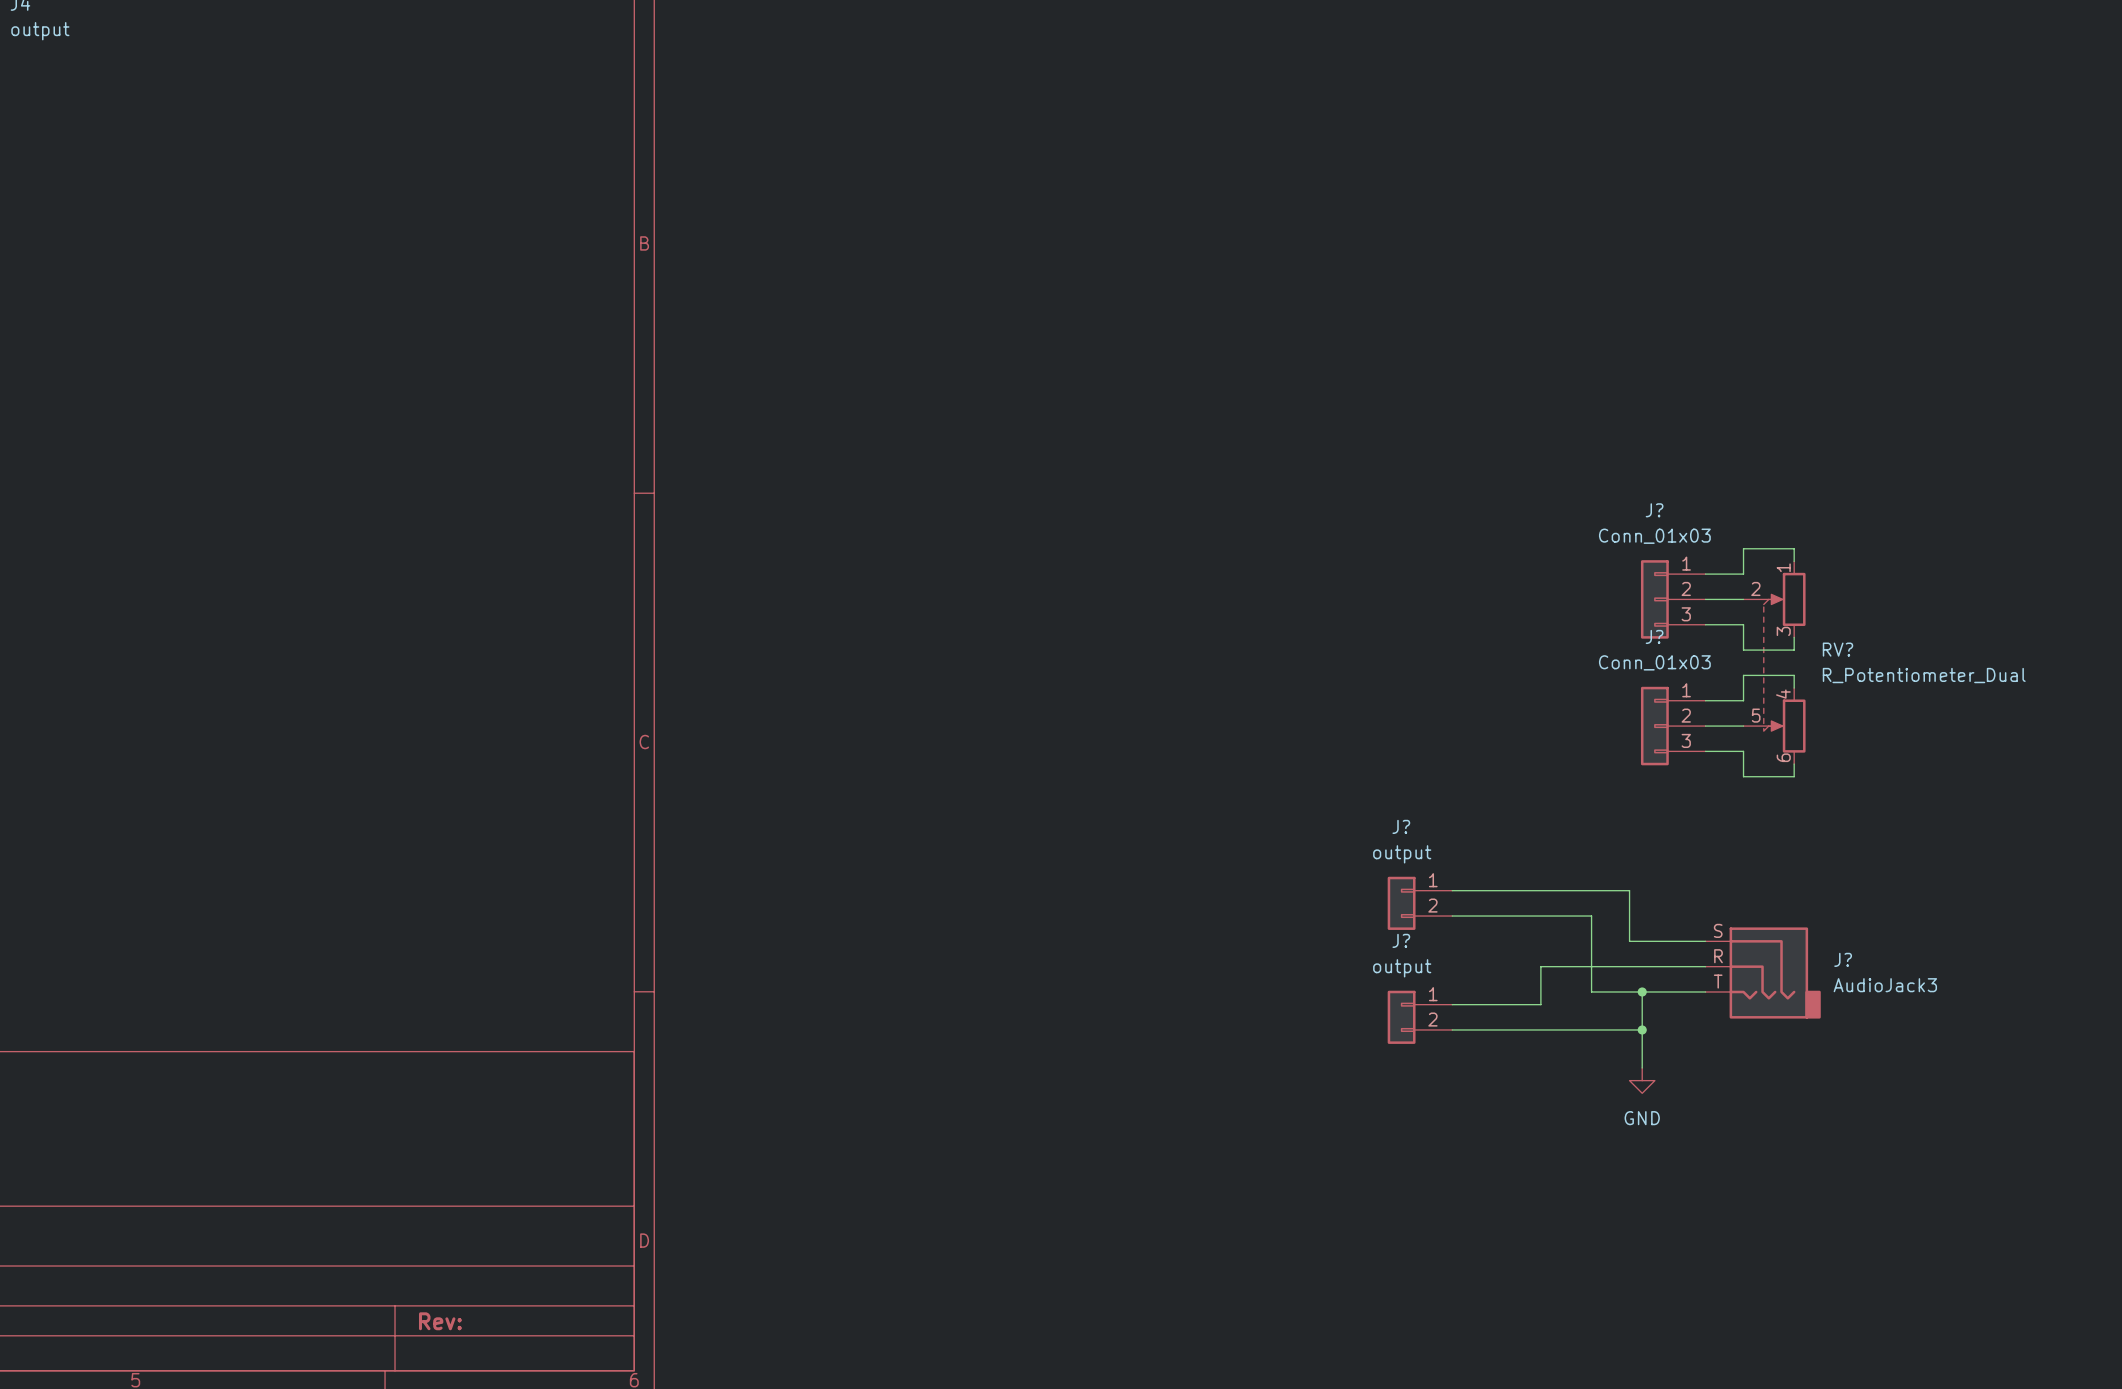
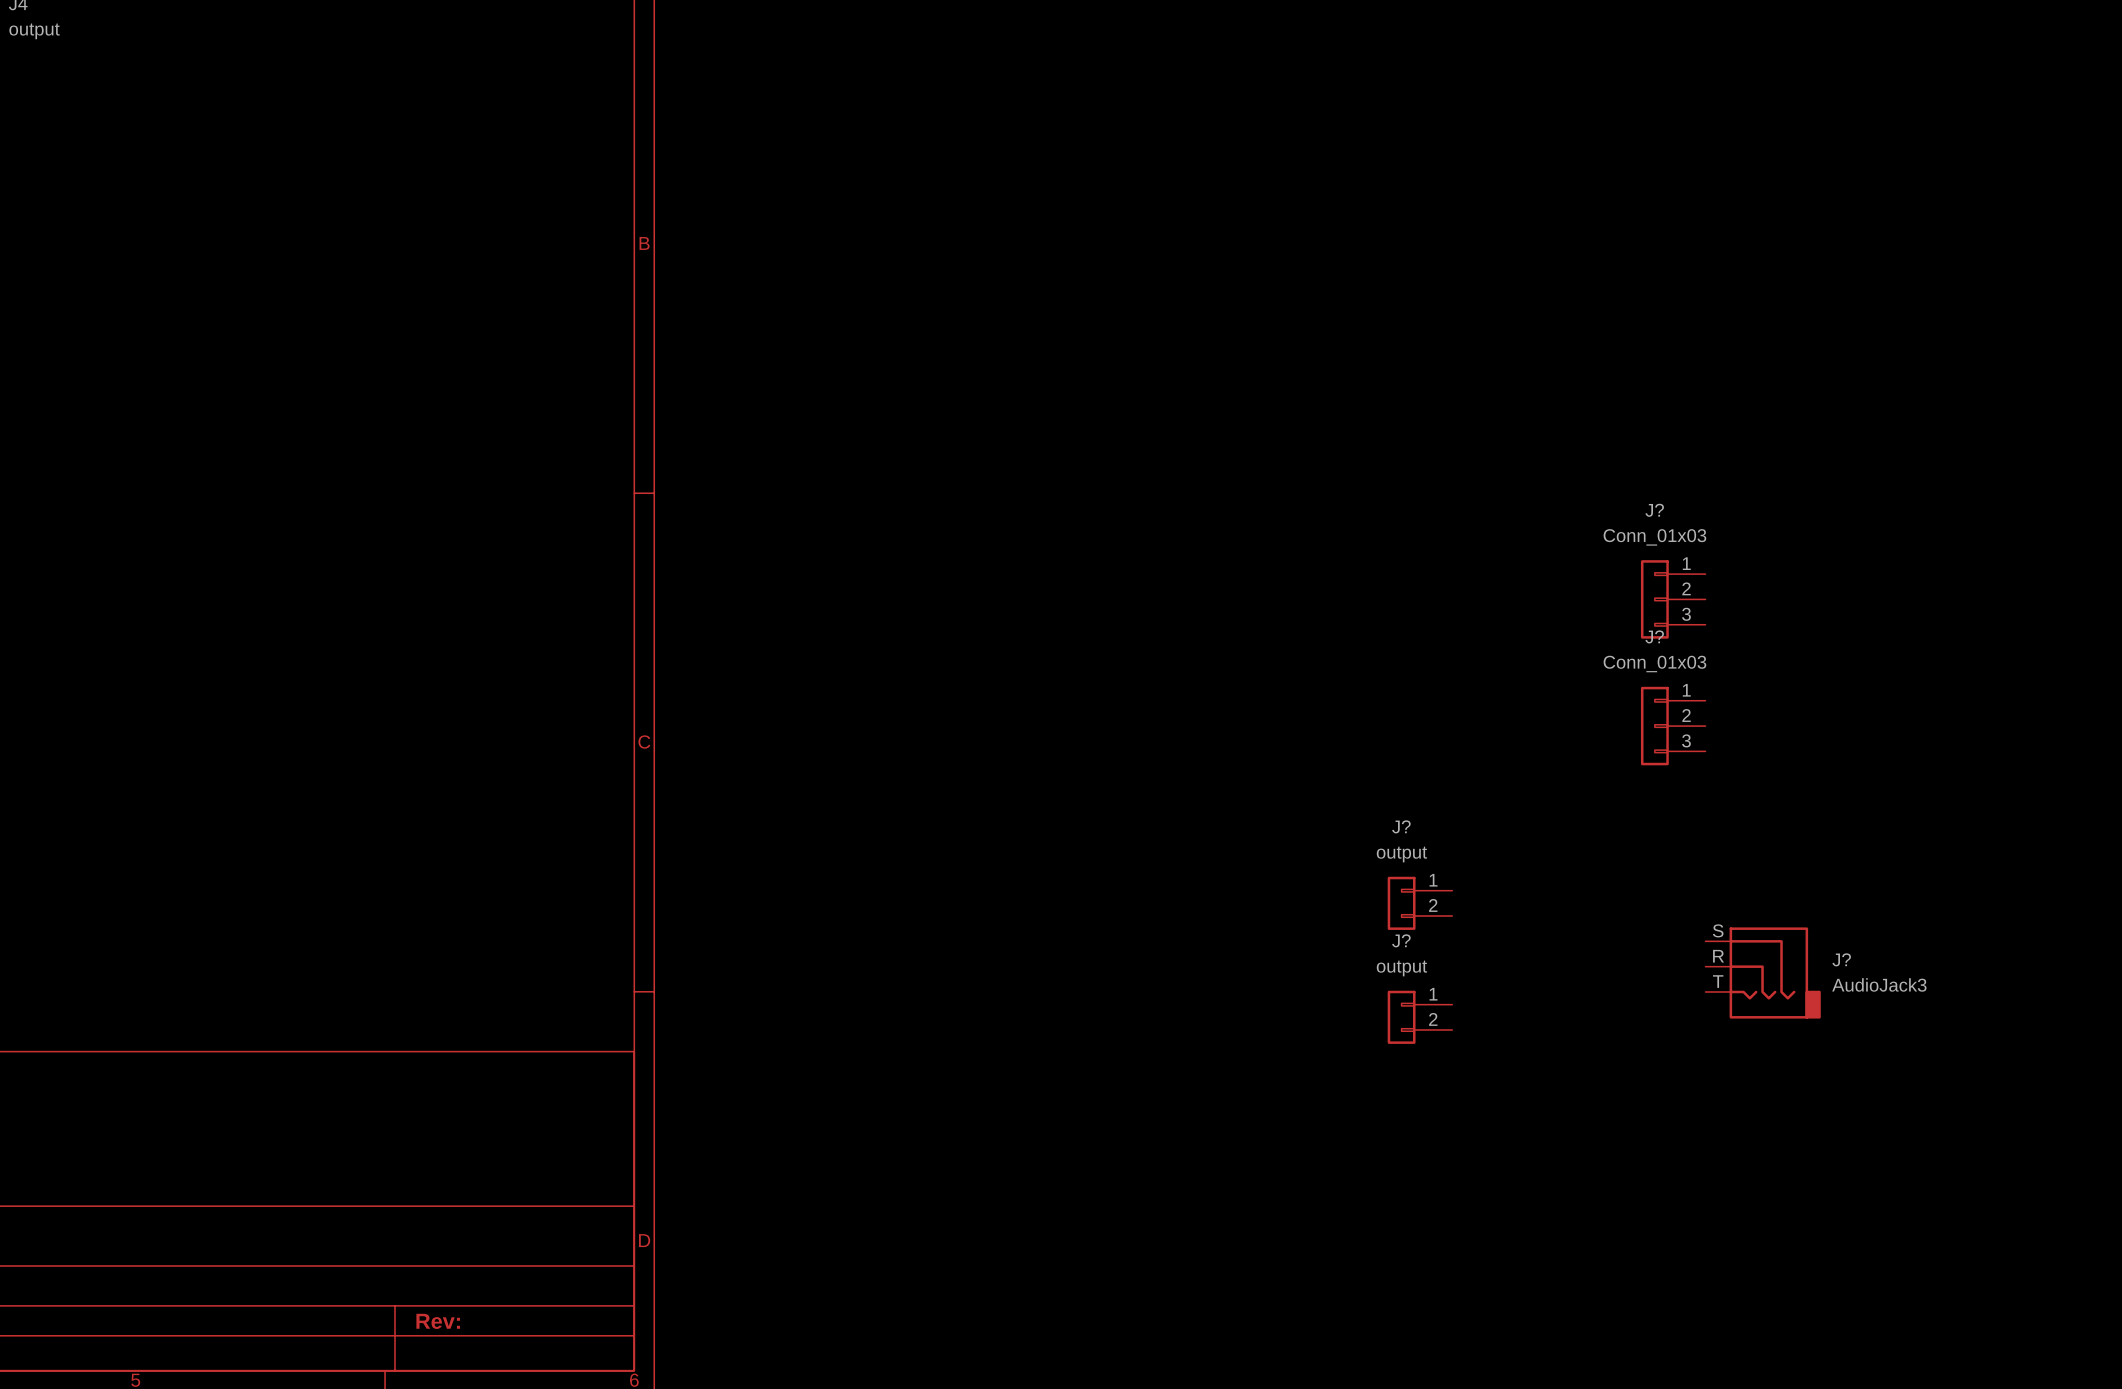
wire: (1794, 561) (1794, 548) (1743, 548) (1743, 574) (1705, 574) -> none
wire: (1705, 599) (1743, 599) -> none
wire: (1705, 624) (1743, 624) (1743, 650) (1794, 650) (1794, 637) -> none
RV?: R_Potentiometer_Dual (1774, 662) -> none
wire: (1794, 688) (1794, 675) (1743, 675) (1743, 700) (1705, 700) -> none
wire: (1705, 726) (1743, 726) -> none
wire: (1705, 751) (1743, 751) (1743, 776) (1794, 776) (1794, 764) -> none
wire: (1452, 890) (1629, 890) (1629, 941) (1705, 941) -> none
wire: (1452, 916) (1591, 916) (1591, 991) (1705, 991) -> none
wire: (1705, 966) (1540, 966) (1540, 1004) (1452, 1004) -> none
wire: (1642, 991) (1642, 1067) -> none
junction: (1642, 991) -> none
wire: (1452, 1029) (1642, 1029) -> none
junction: (1642, 1029) -> none
power symbol: GND (1642, 1080) -> none

